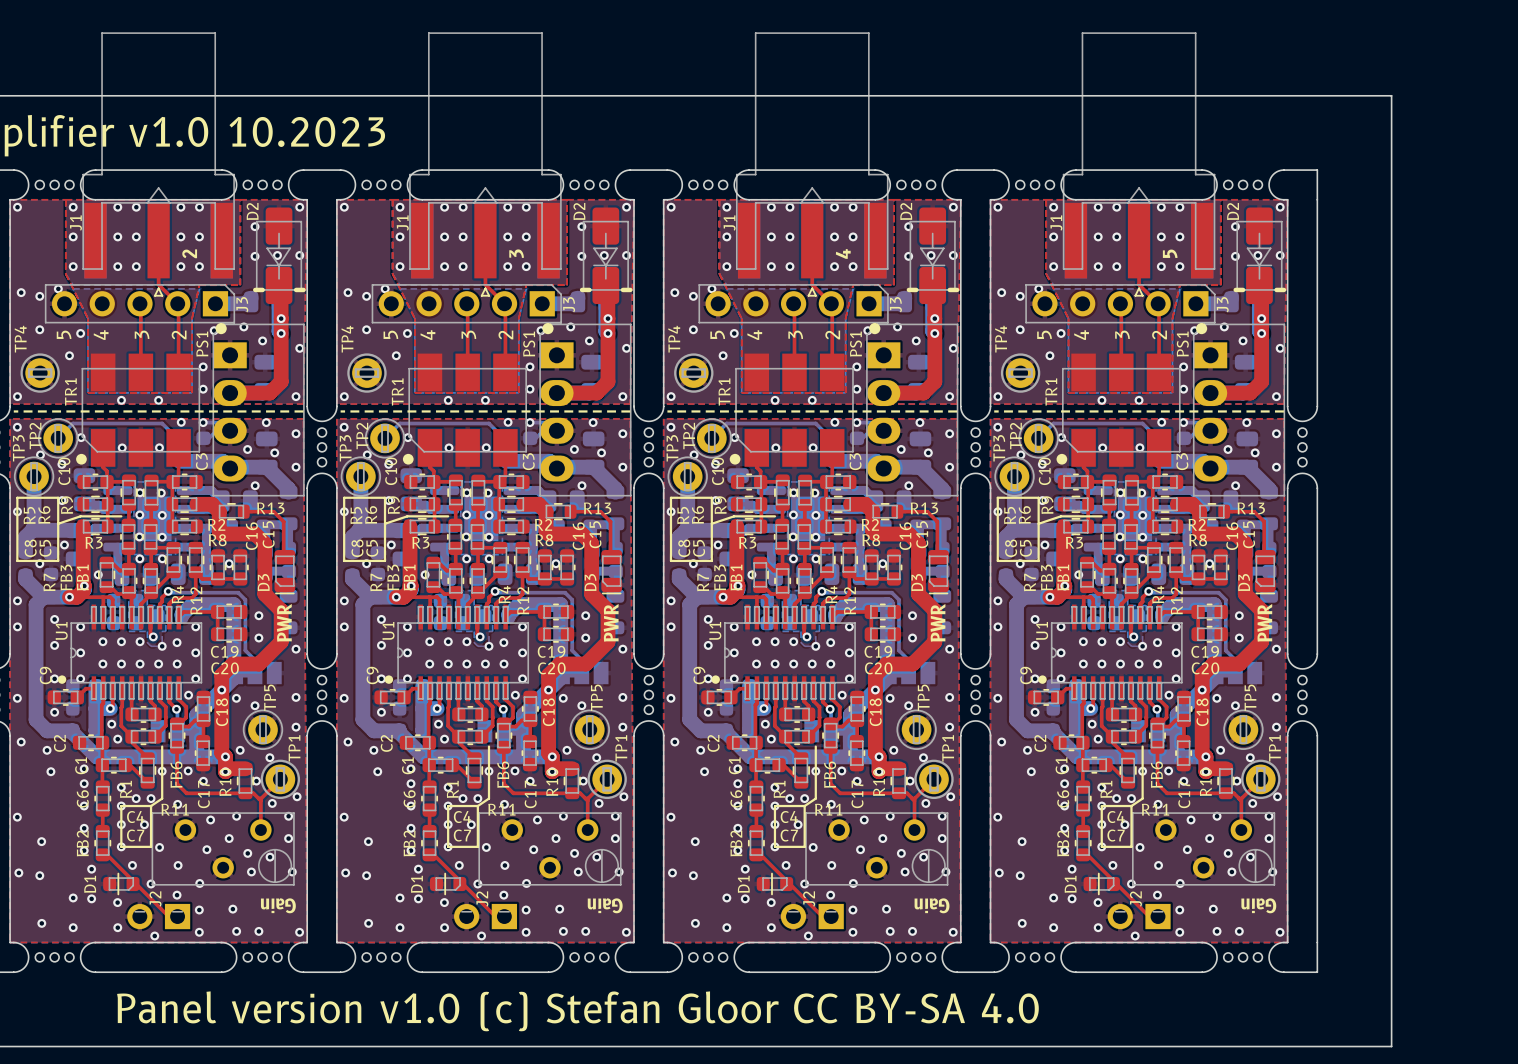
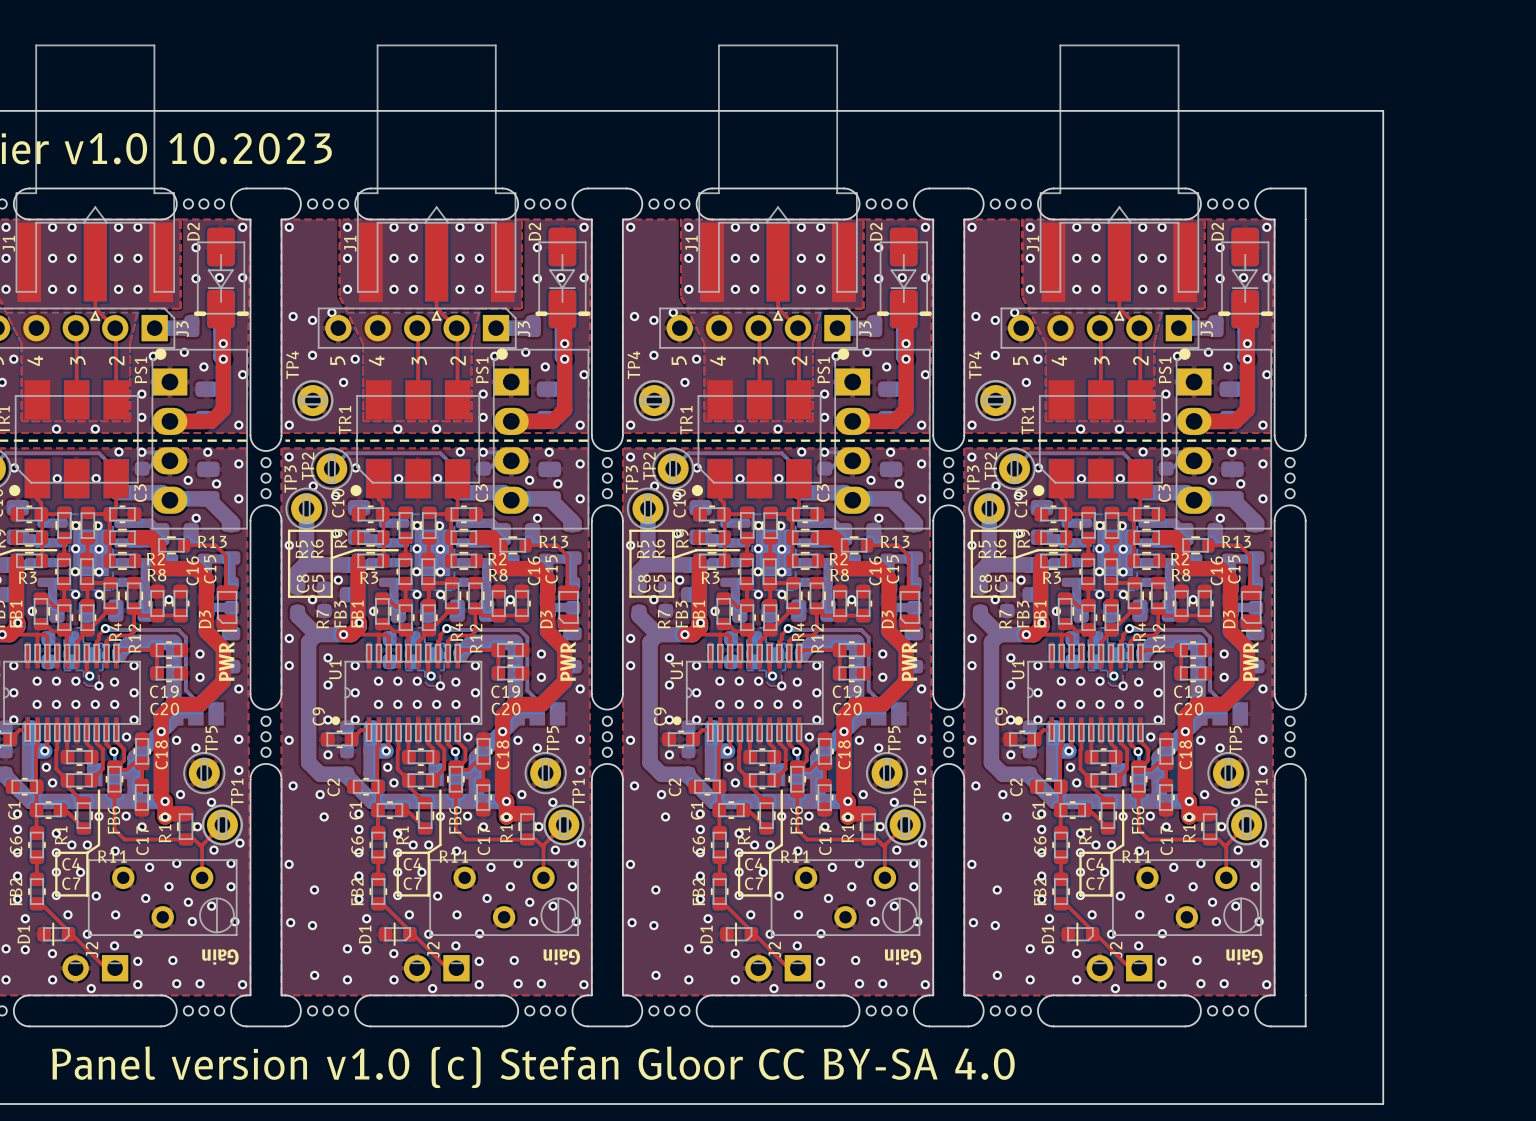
text: 2 (189, 253) -> none
text: 3 (516, 253) -> none
text: 4 (843, 253) -> none
text: 5 (1170, 253) -> none

